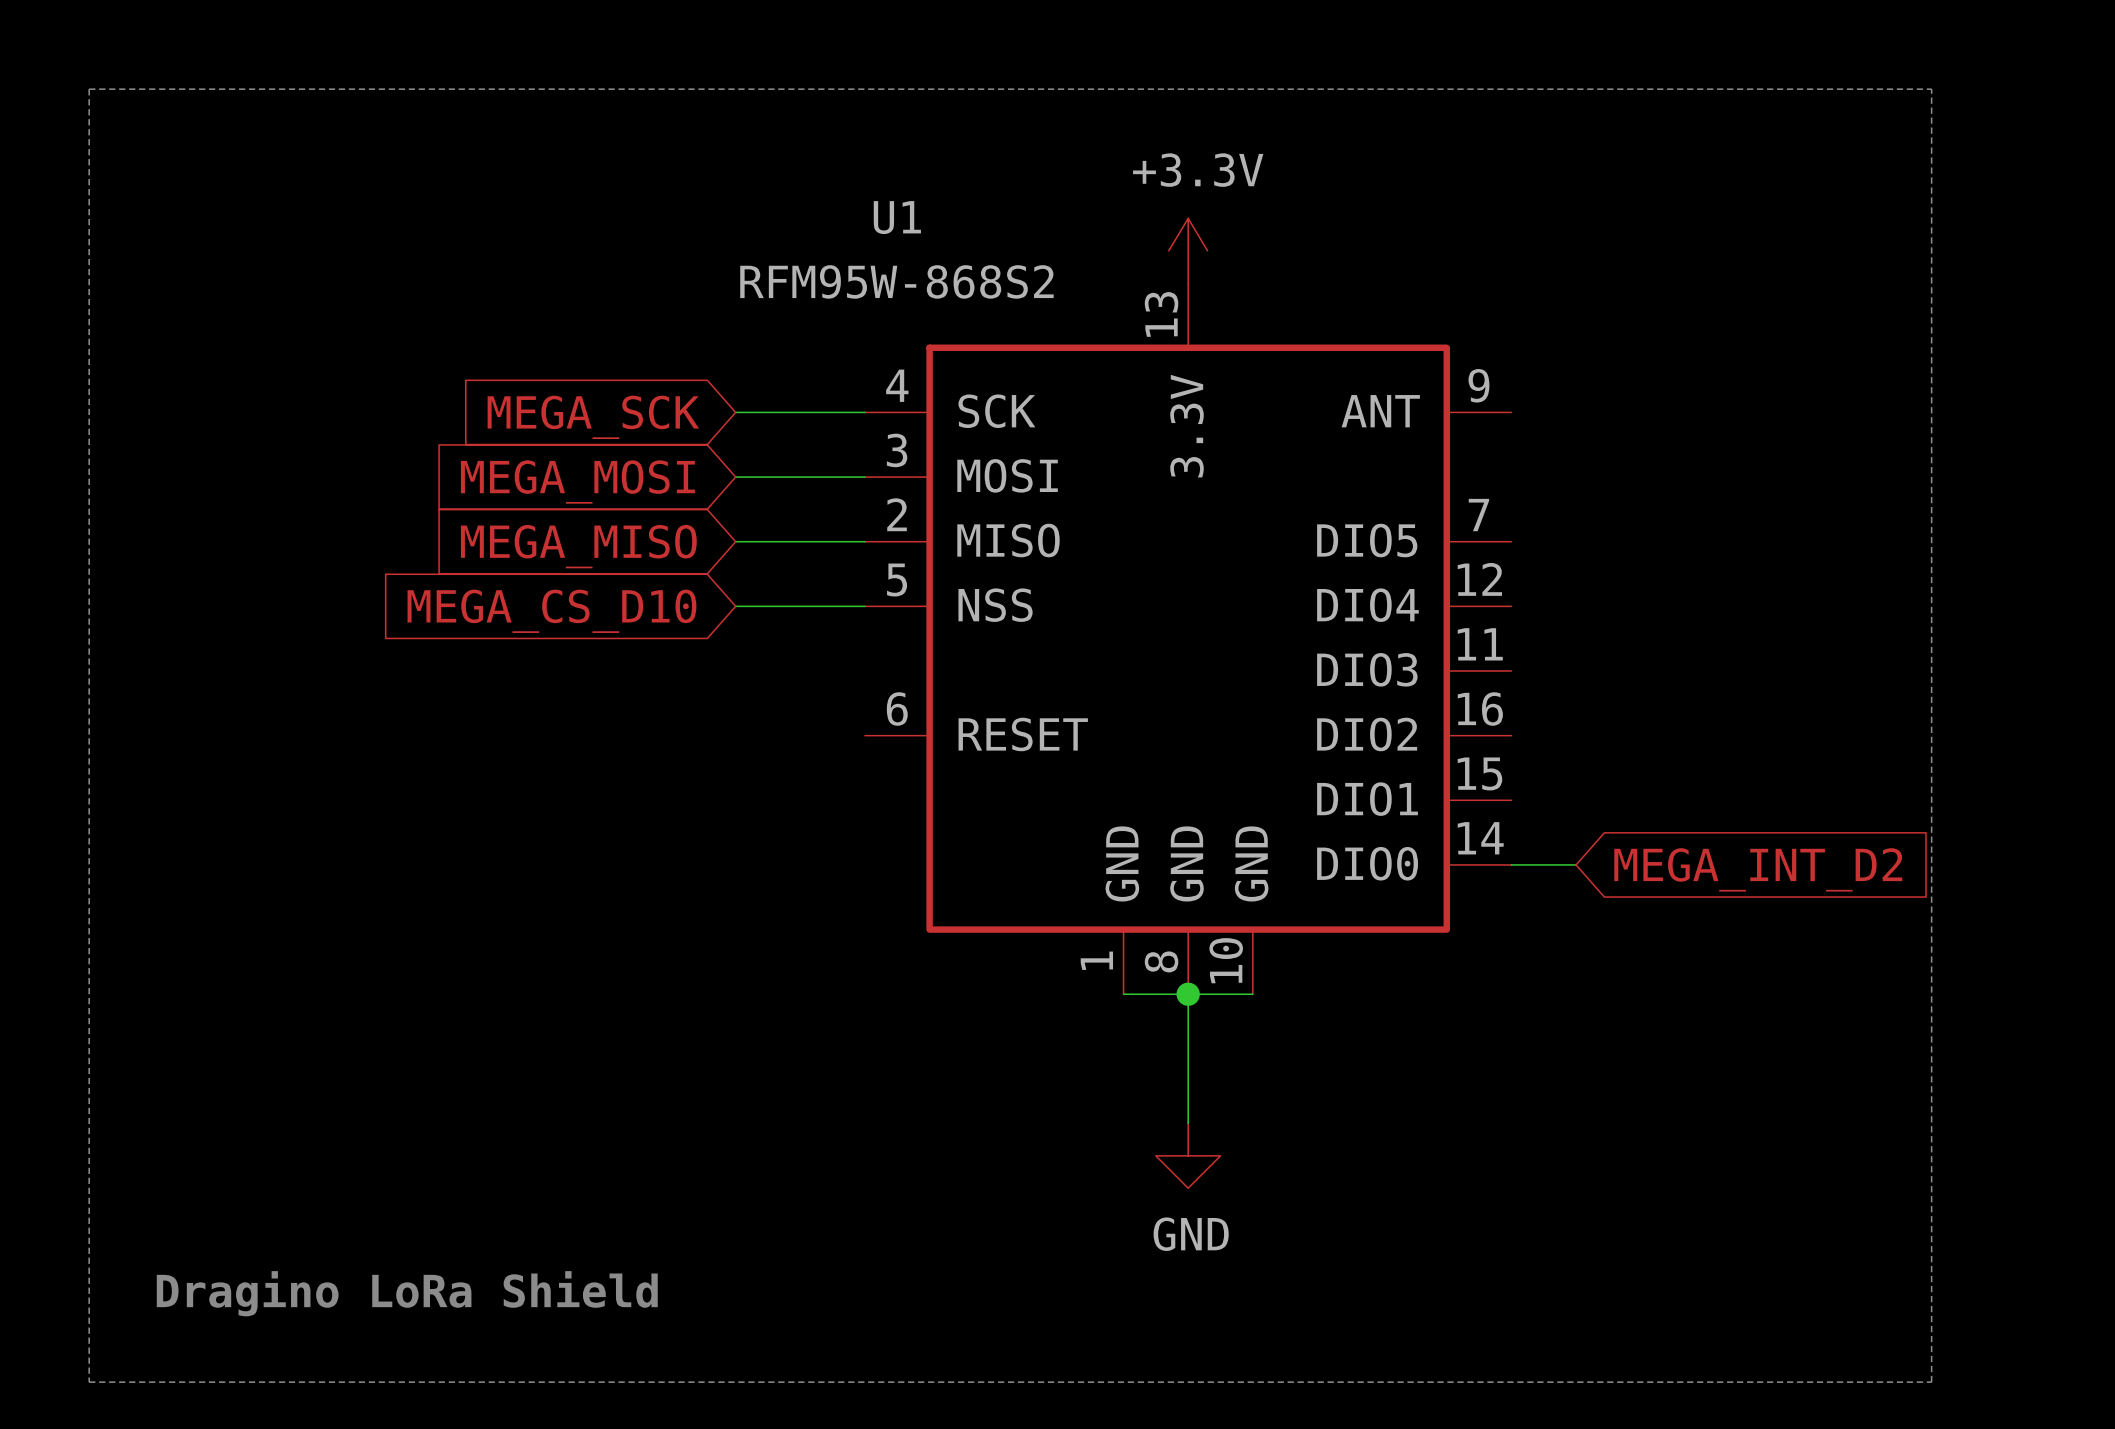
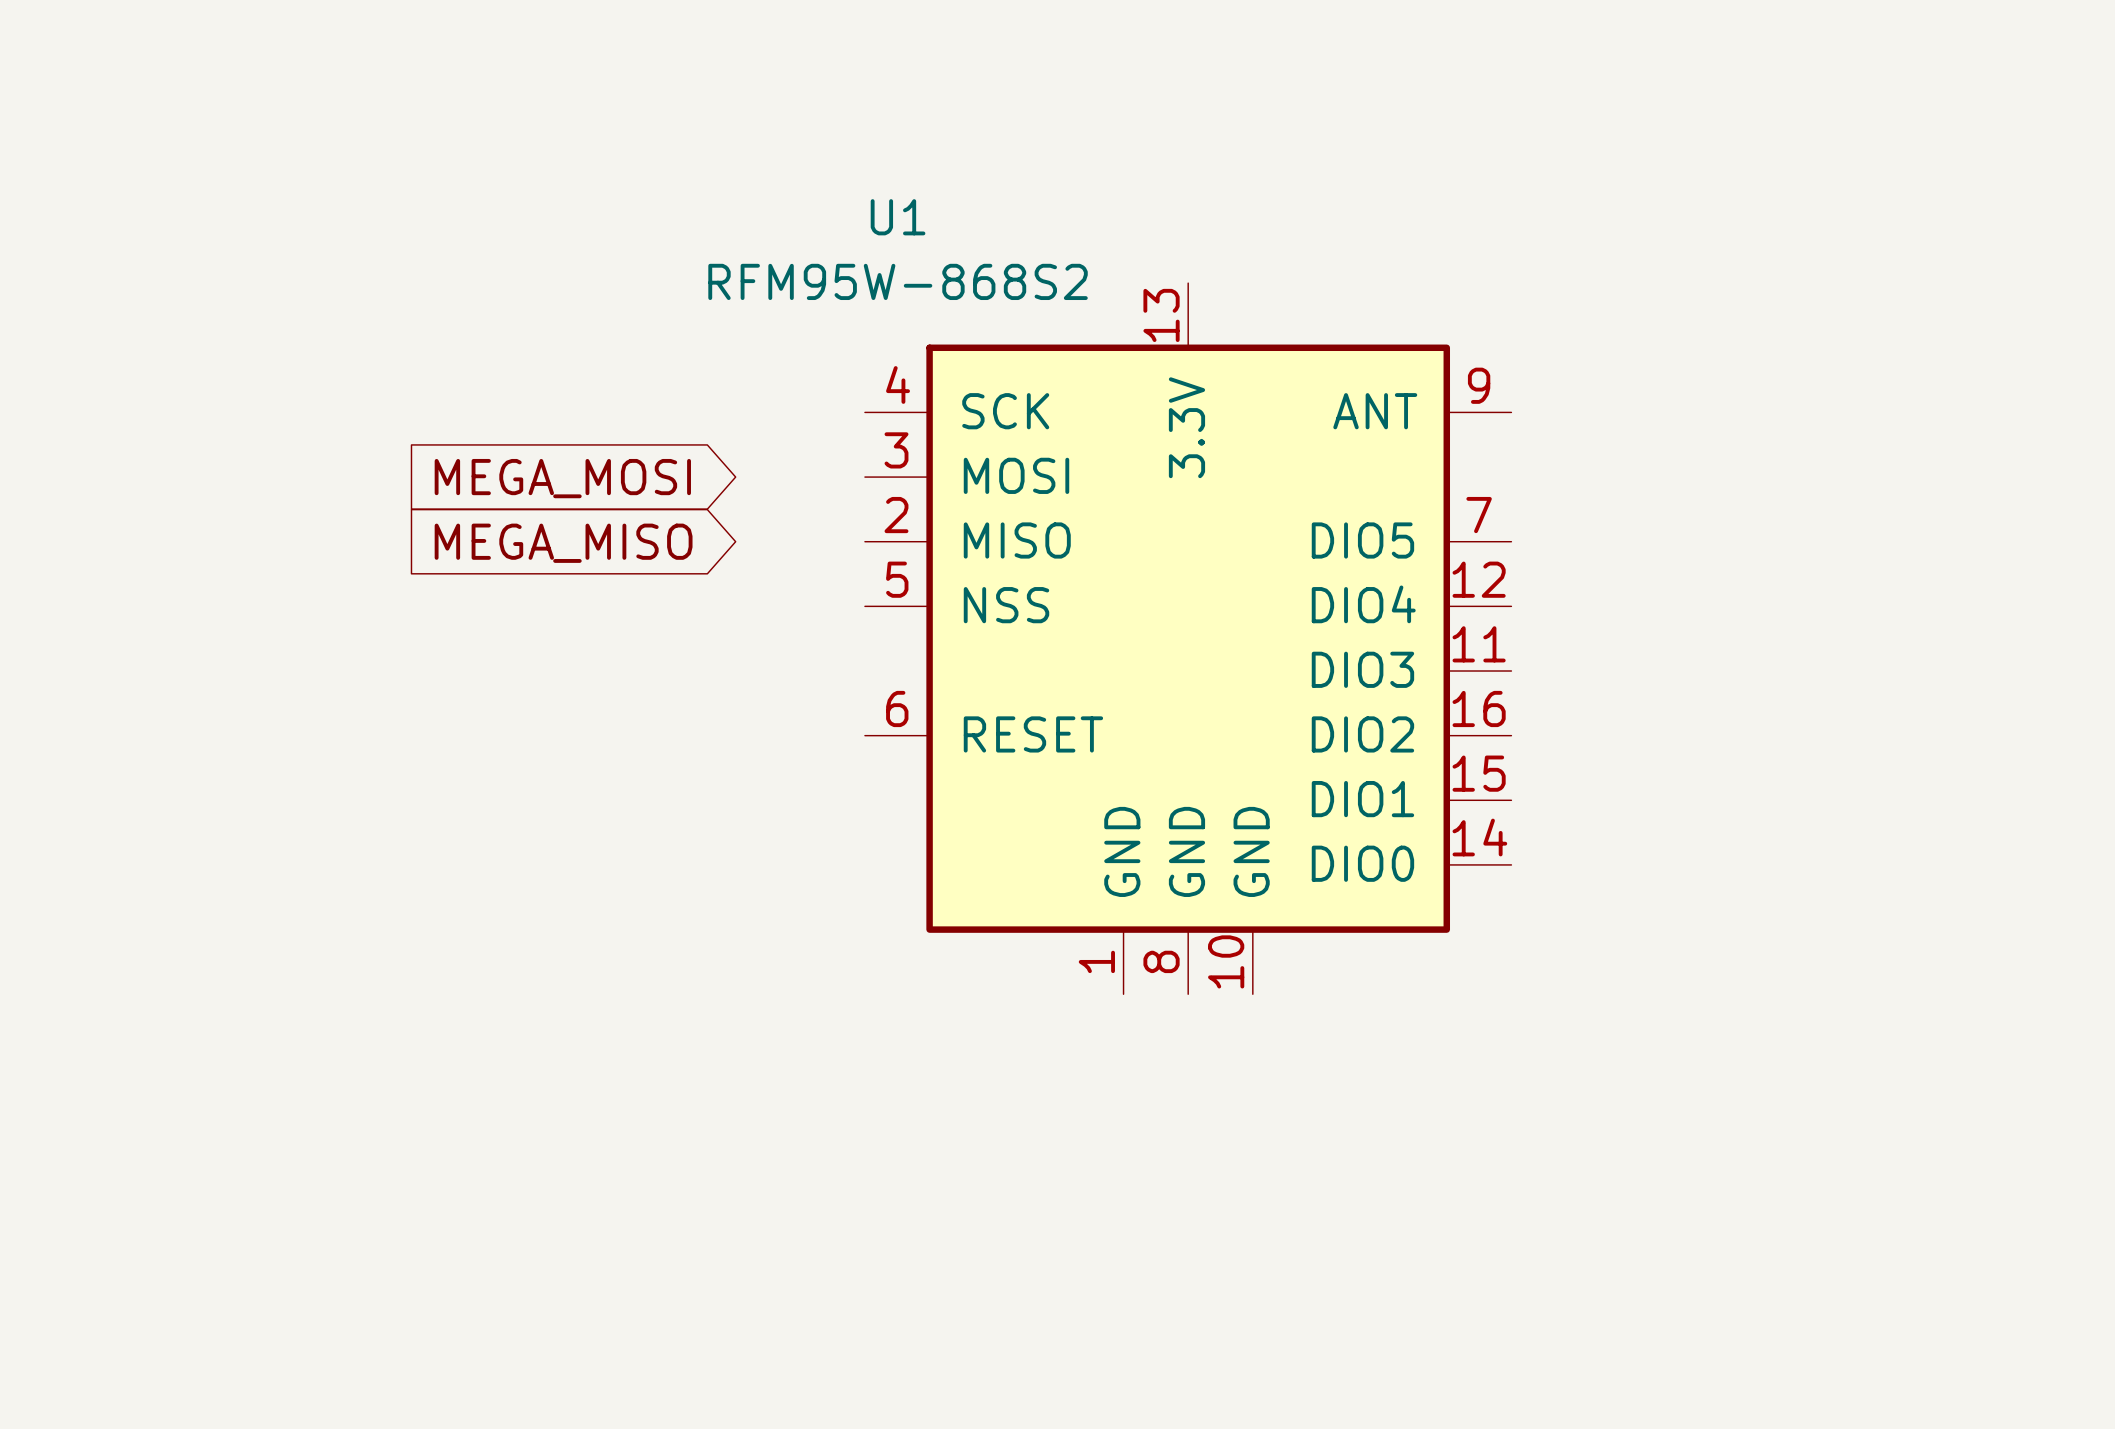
line: (89, 89) (89, 1382) (1931, 1382) (1931, 89) (89, 89) -> none
power symbol: +3.3V (1188, 250) -> none
wire: (735, 412) (864, 412) -> none
global label: MEGA_SCK (593, 417) -> none
wire: (735, 477) (864, 477) -> none
wire: (735, 541) (864, 541) -> none
wire: (735, 606) (864, 606) -> none
global label: MEGA_CS_D10 (551, 611) -> none
wire: (1511, 864) (1576, 864) -> none
global label: MEGA_INT_D2 (1758, 869) -> none
wire: (1123, 994) (1252, 994) -> none
wire: (1188, 994) (1188, 1123) -> none
junction: (1188, 994) -> none
power symbol: GND (1188, 1155) -> none
text: Dragino LoRa Shield (407, 1293) -> none

